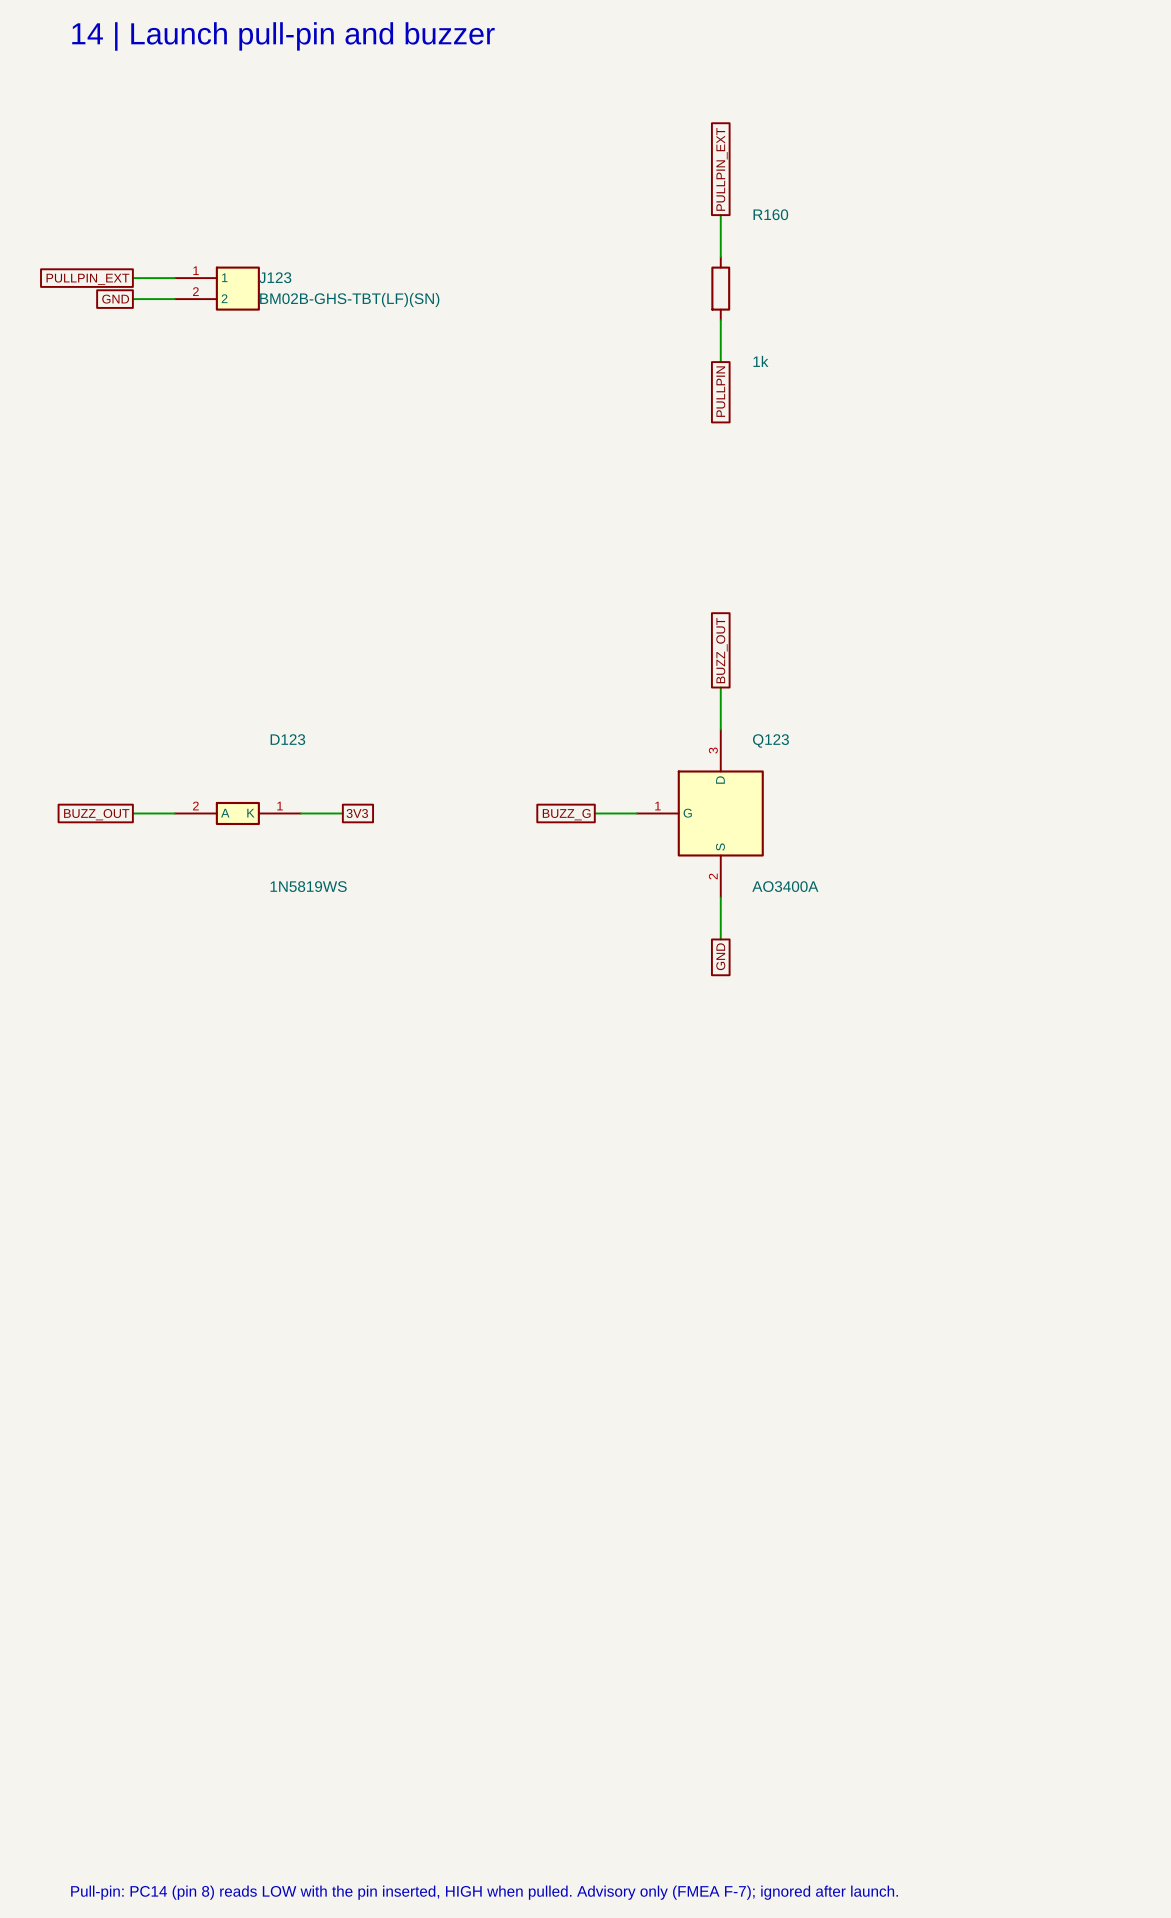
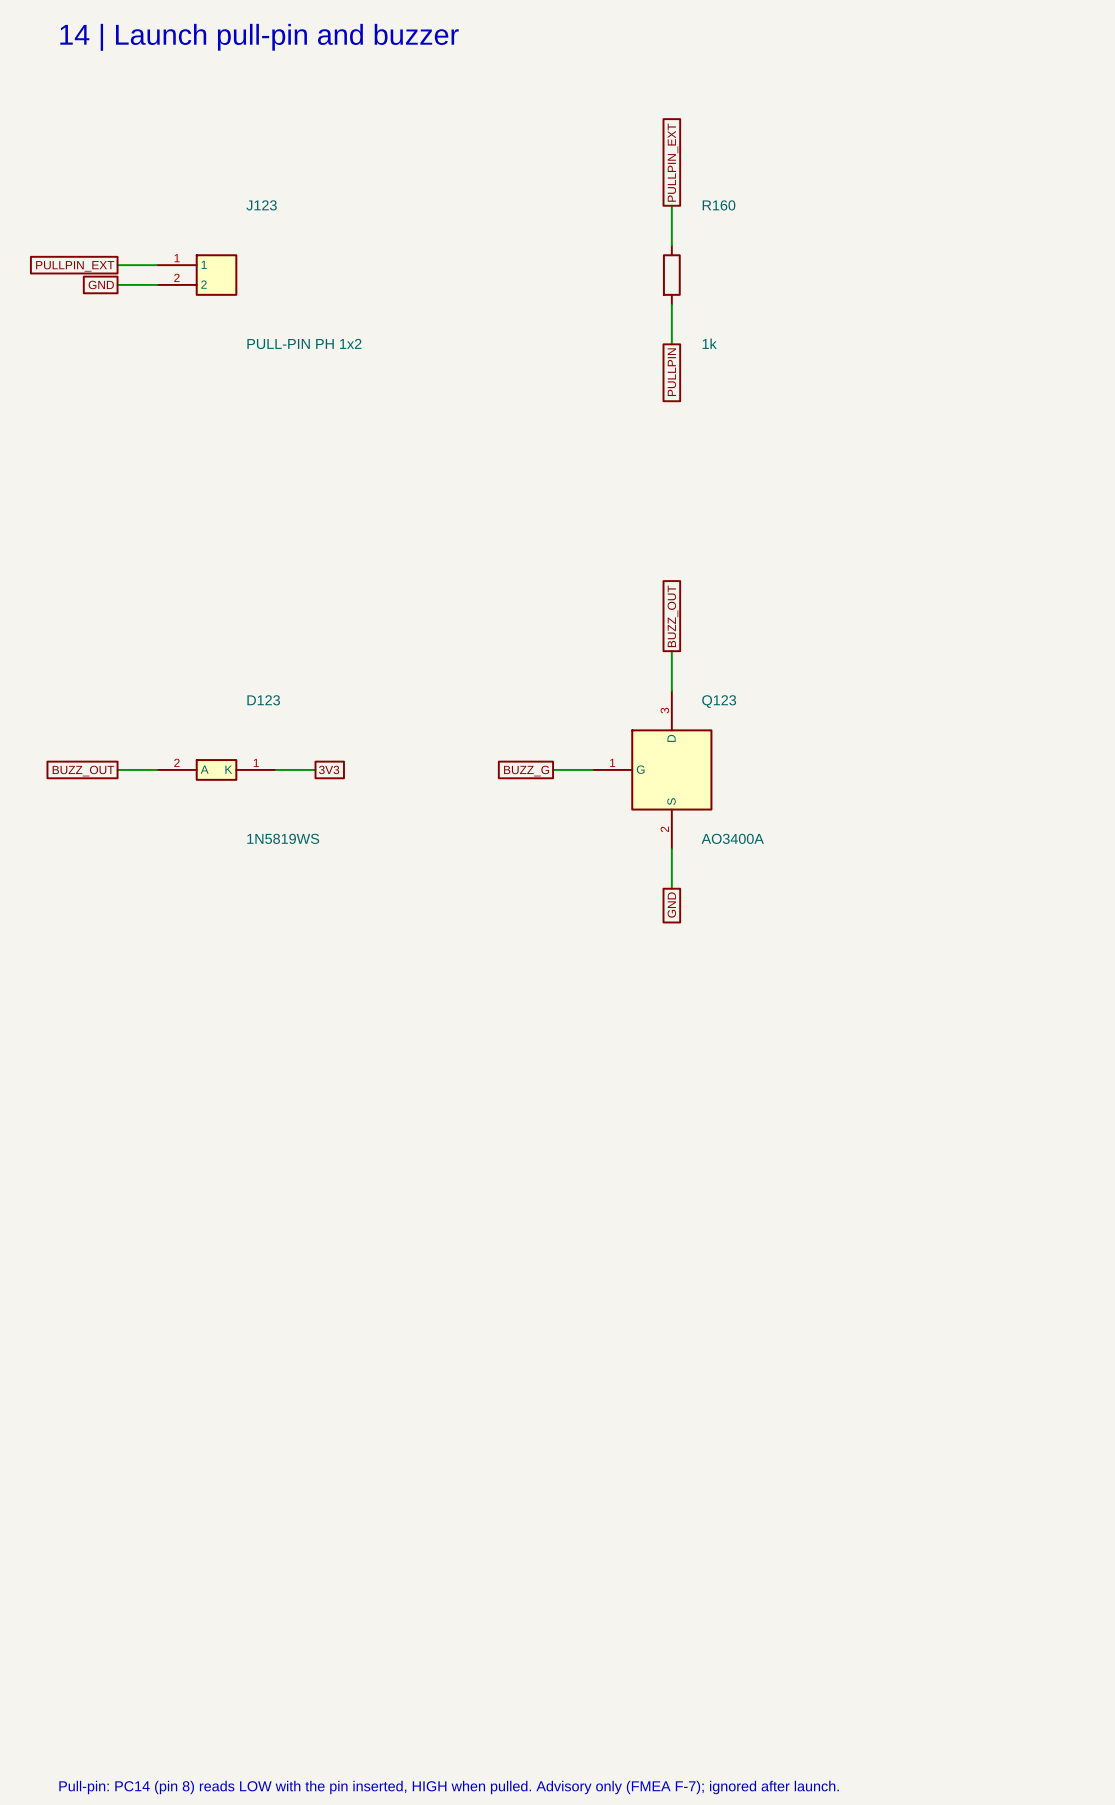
J123 name position: J123 (275, 277) -> J123 (261, 205)
J123 value: BM02B-GHS-TBT(LF)(SN) (349, 300) -> PULL-PIN PH 1x2 (304, 343)

